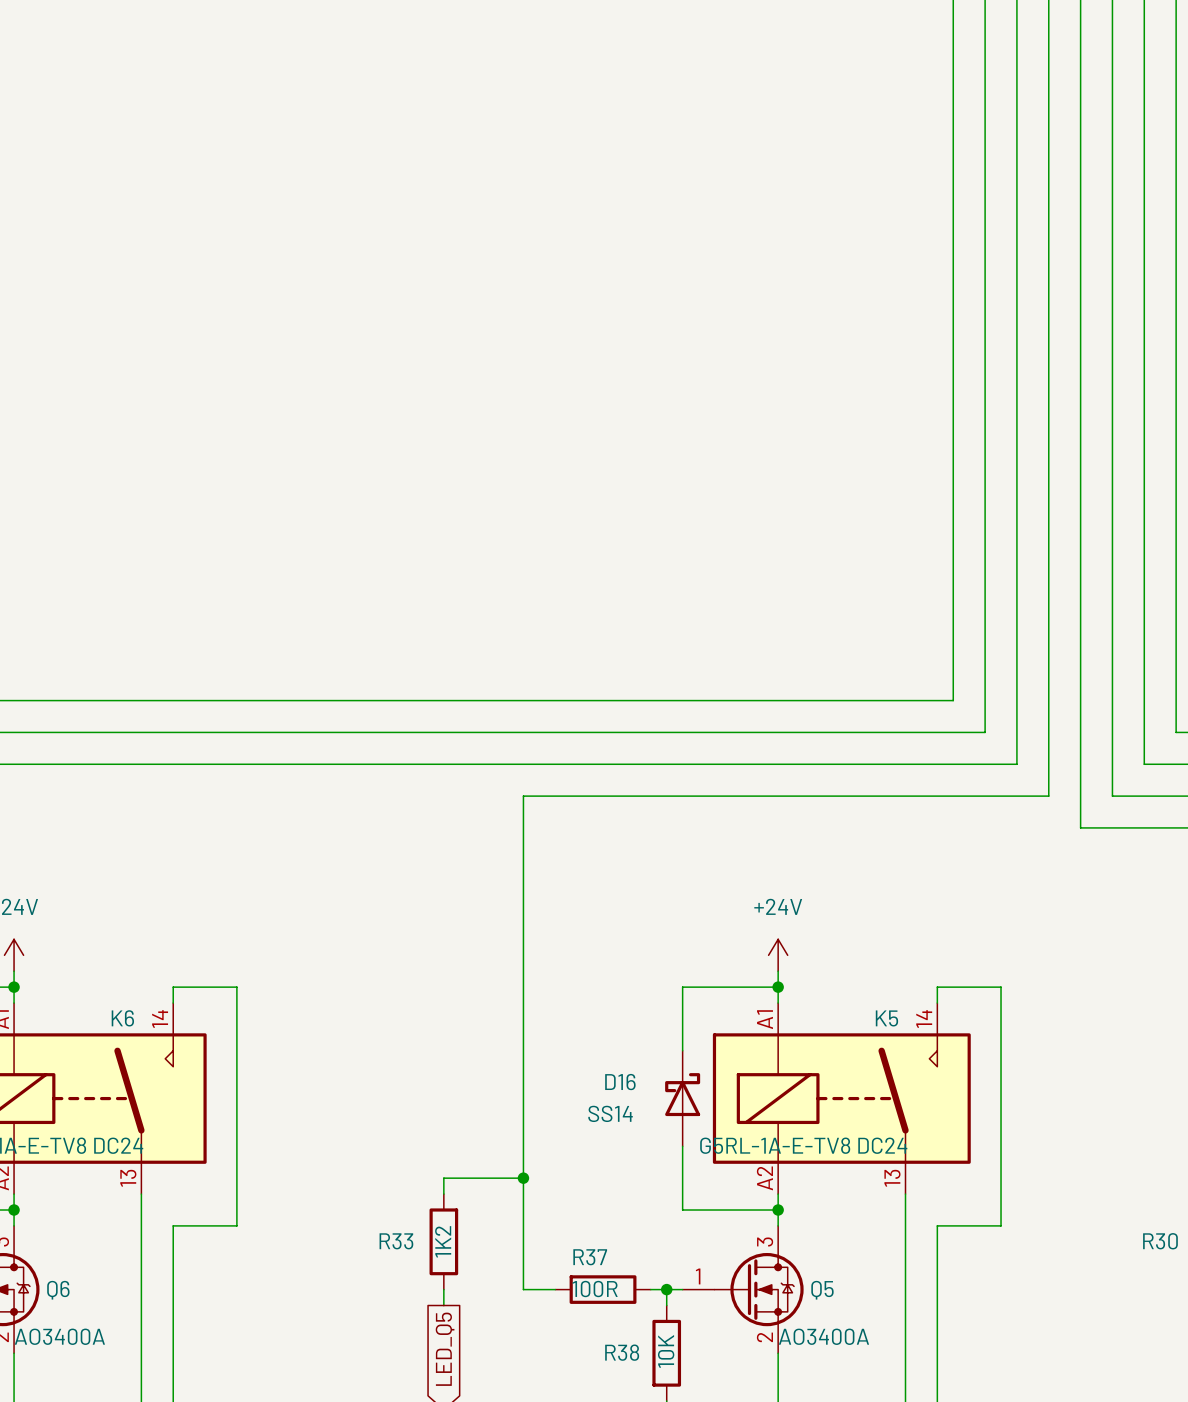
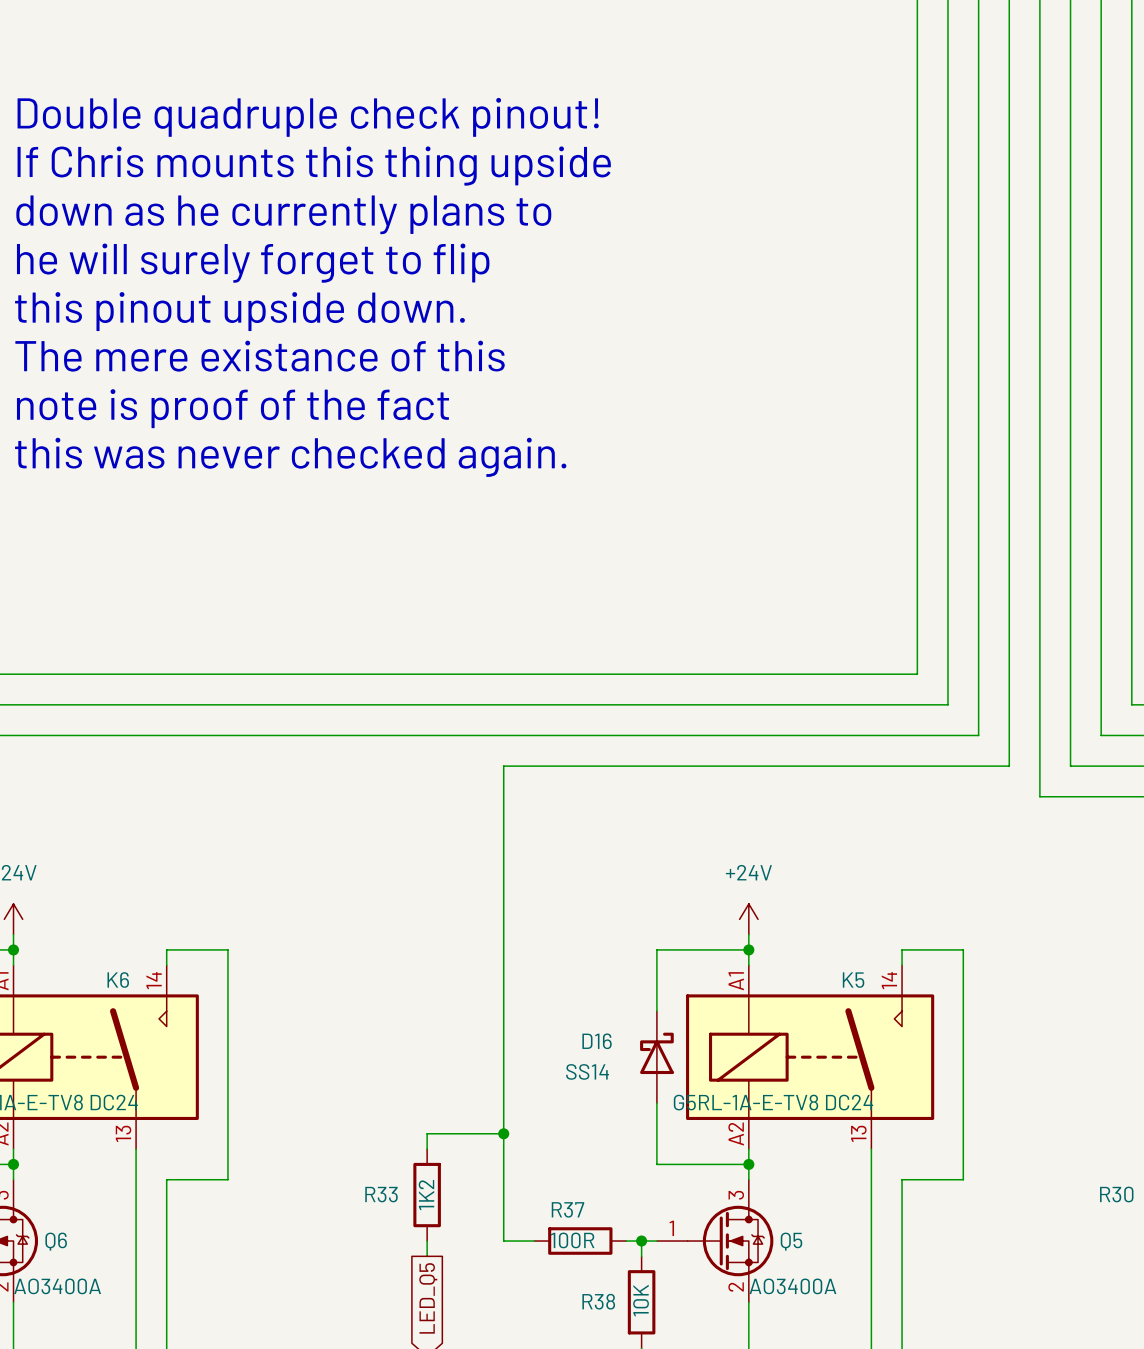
text: none -> Double quadruple check pinout! (308, 117)
text: none -> If Chris mounts this thing upside (314, 166)
text: none -> down as he currently plans to (283, 214)
text: none -> he will surely forget to flip (253, 263)
text: none -> this pinout upside down. (239, 311)
text: none -> The mere existance of this (260, 356)
text: none -> note is proof of the fact (233, 408)
text: none -> this was never checked again. (290, 457)

